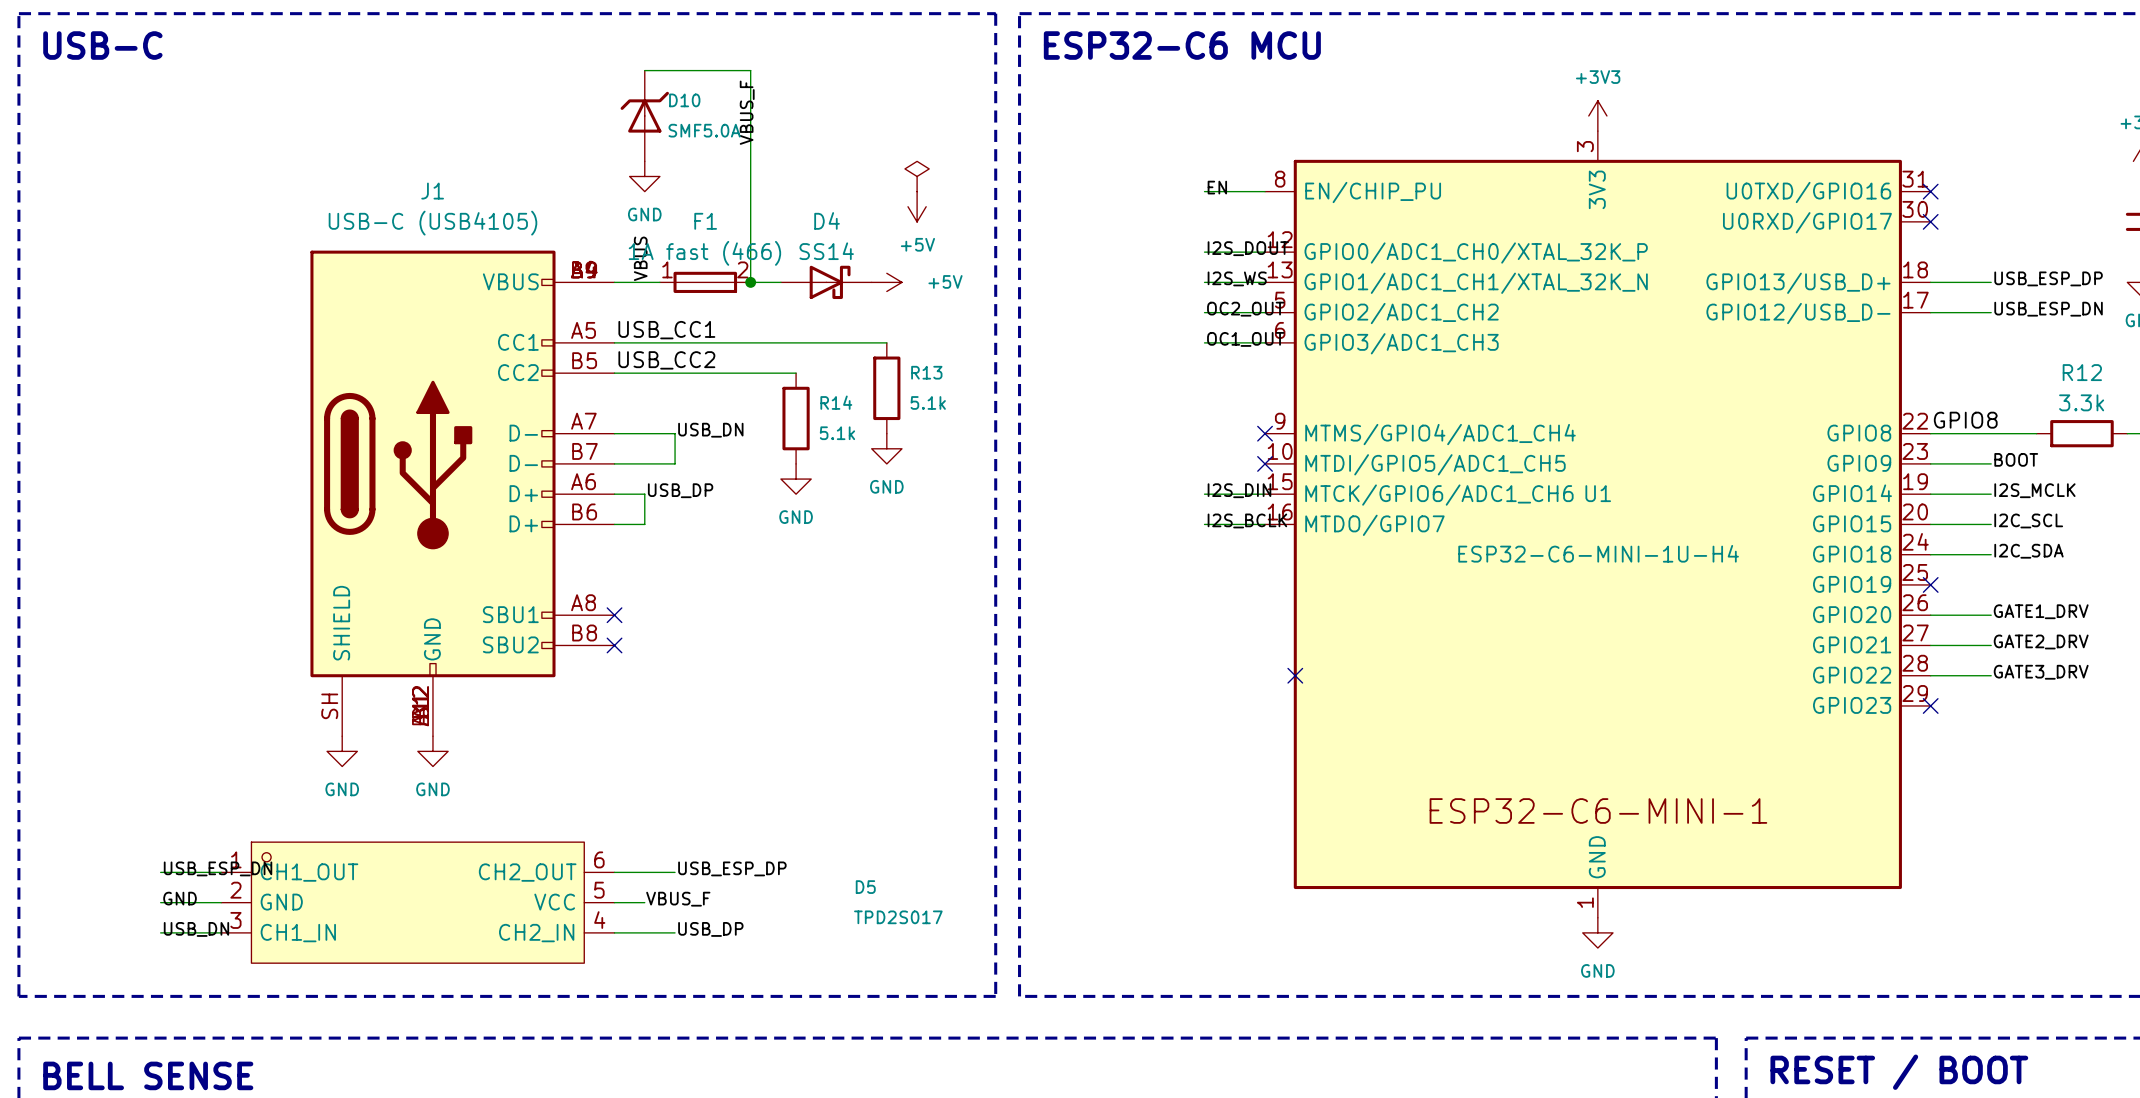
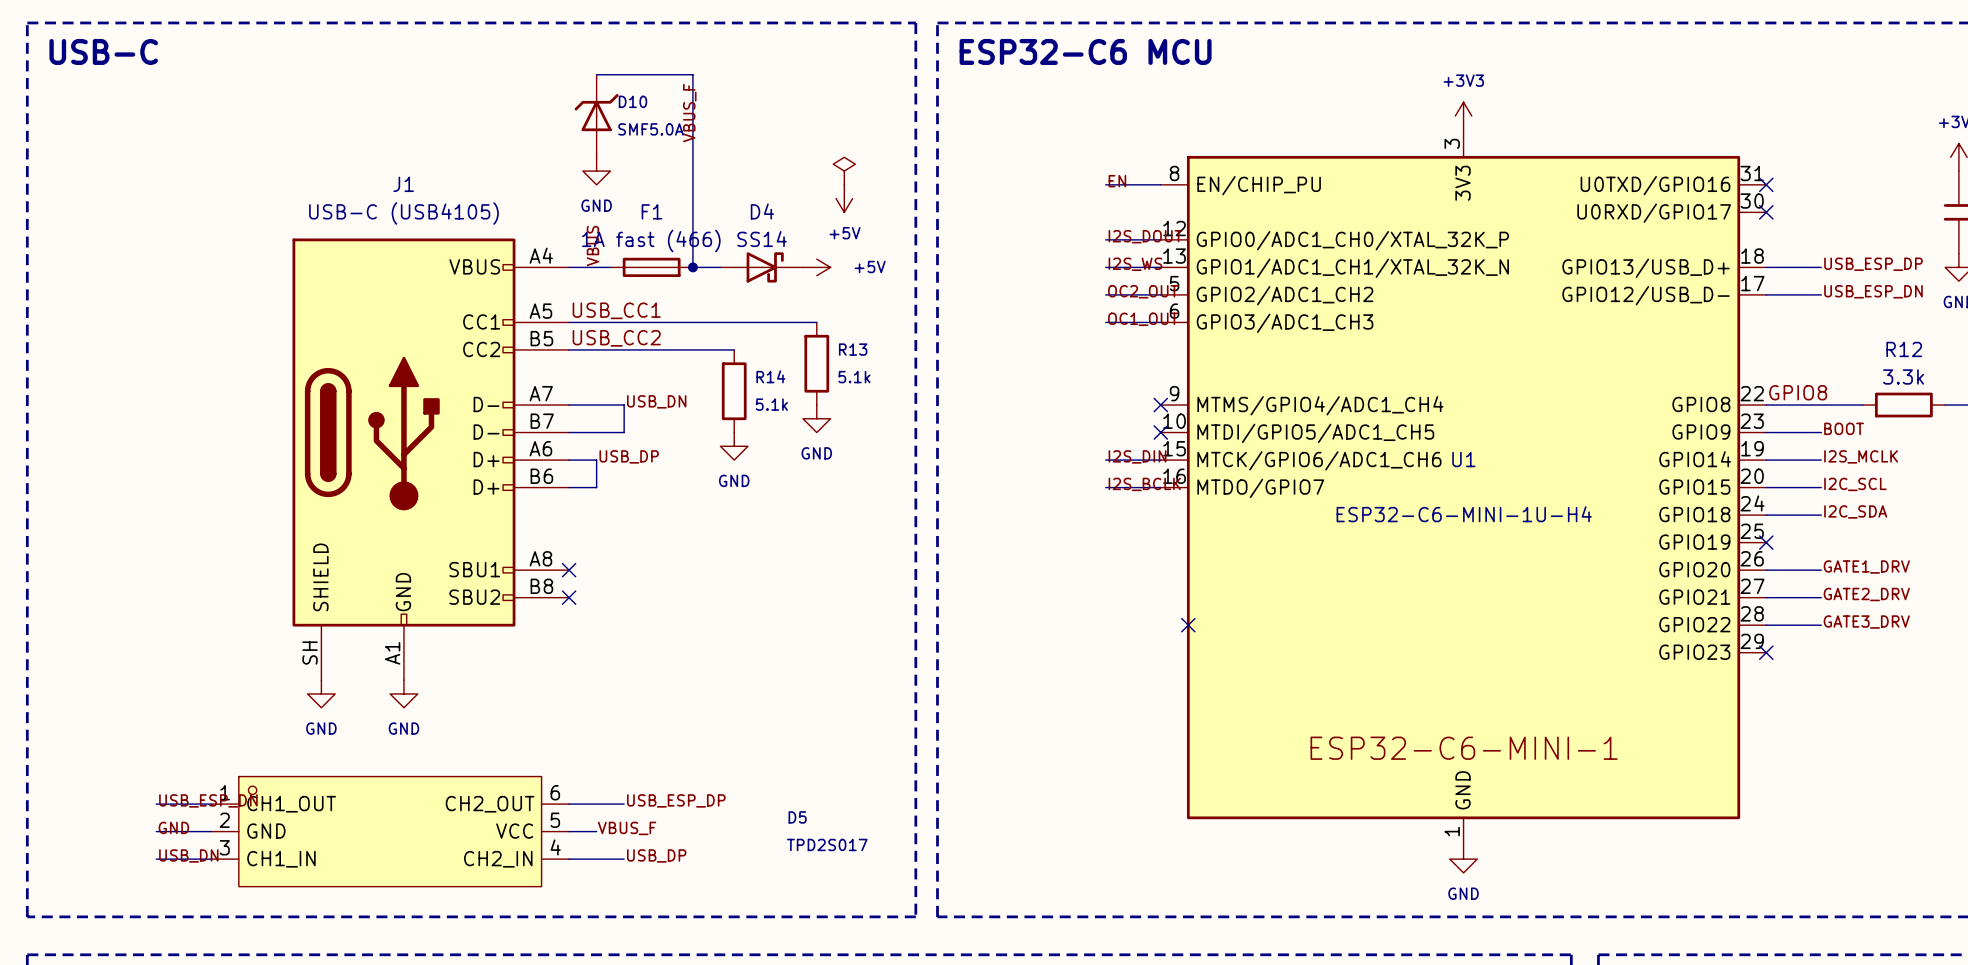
J1 symbol: [310, 250, 615, 737] -> [292, 238, 570, 681]
F1 pin number: 1 (667, 269) -> none
F1 pin number: 2 (742, 269) -> none

